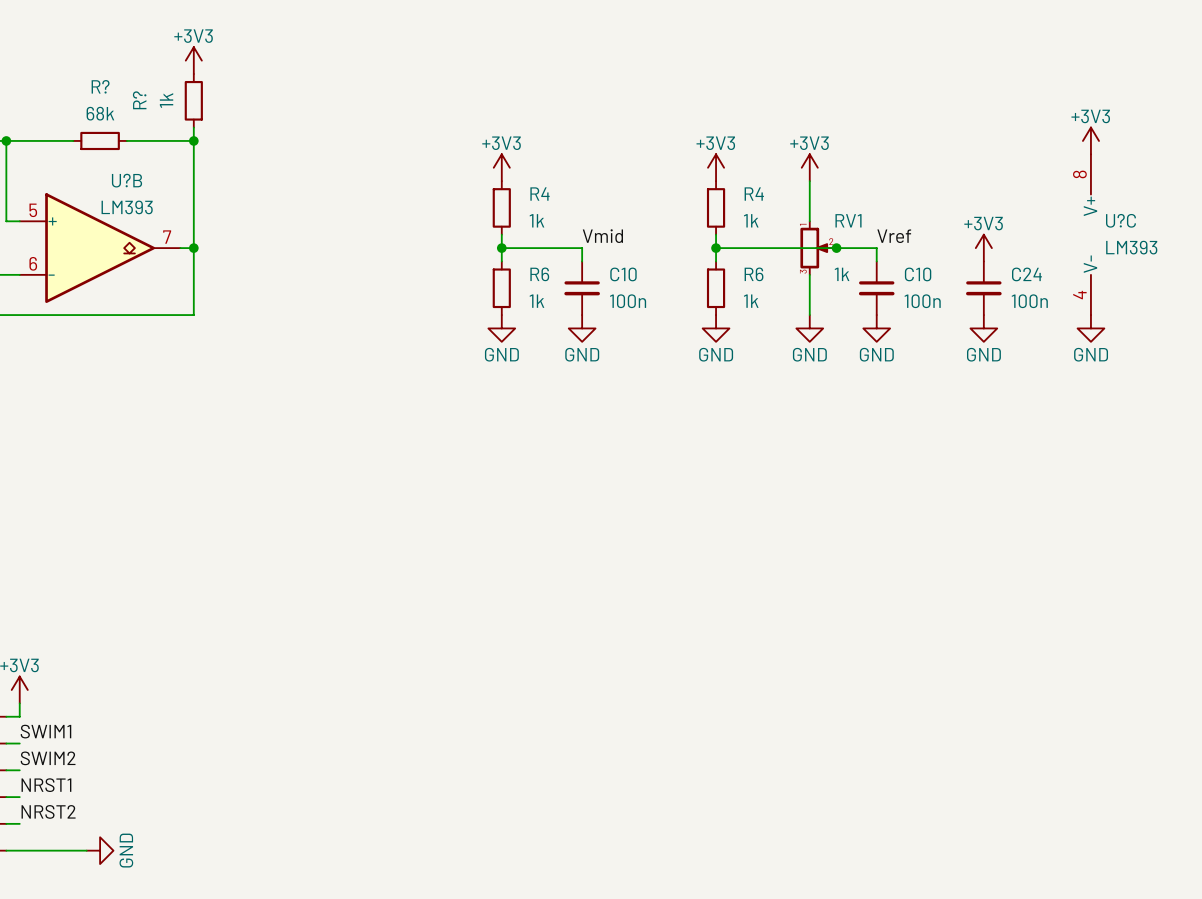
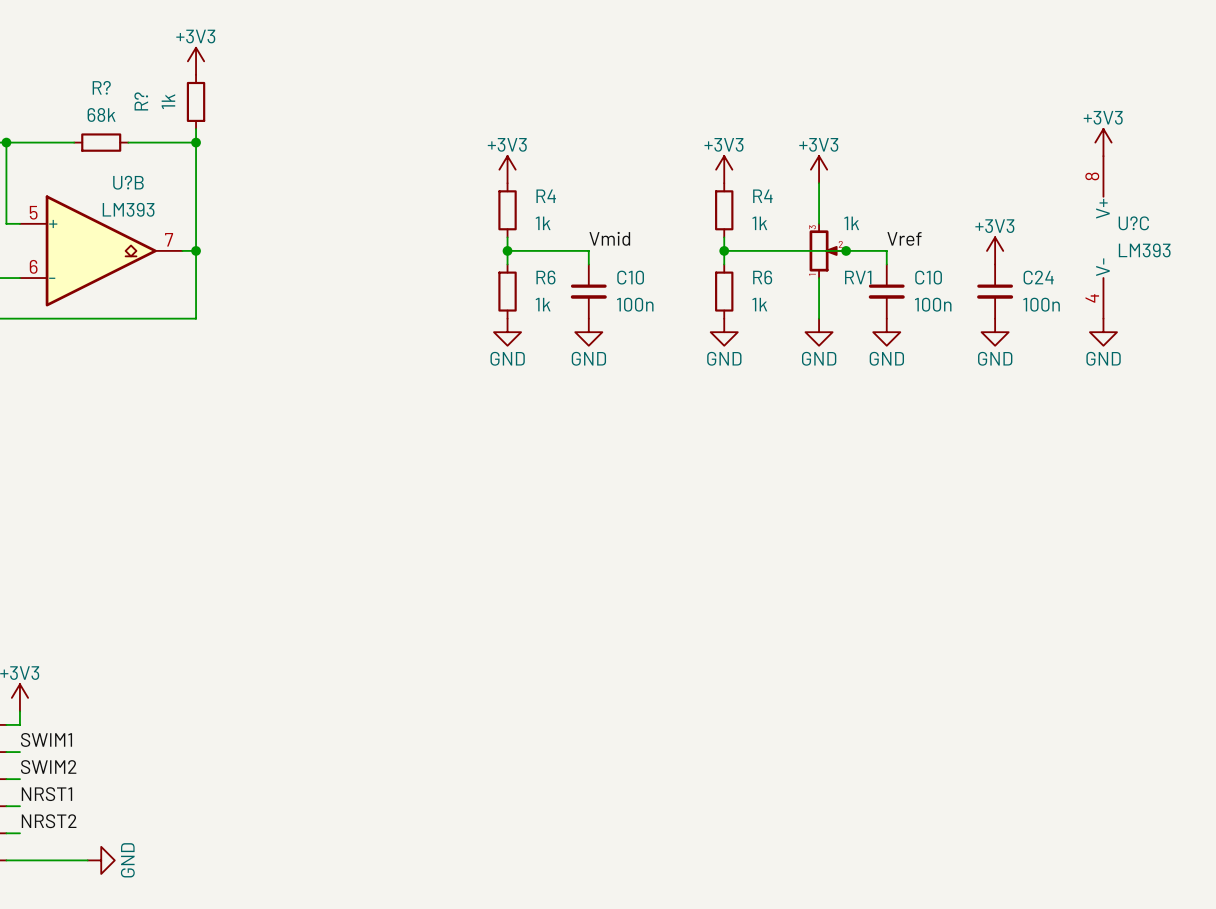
RV1 flip: as is (813, 248) -> up-down (823, 250)

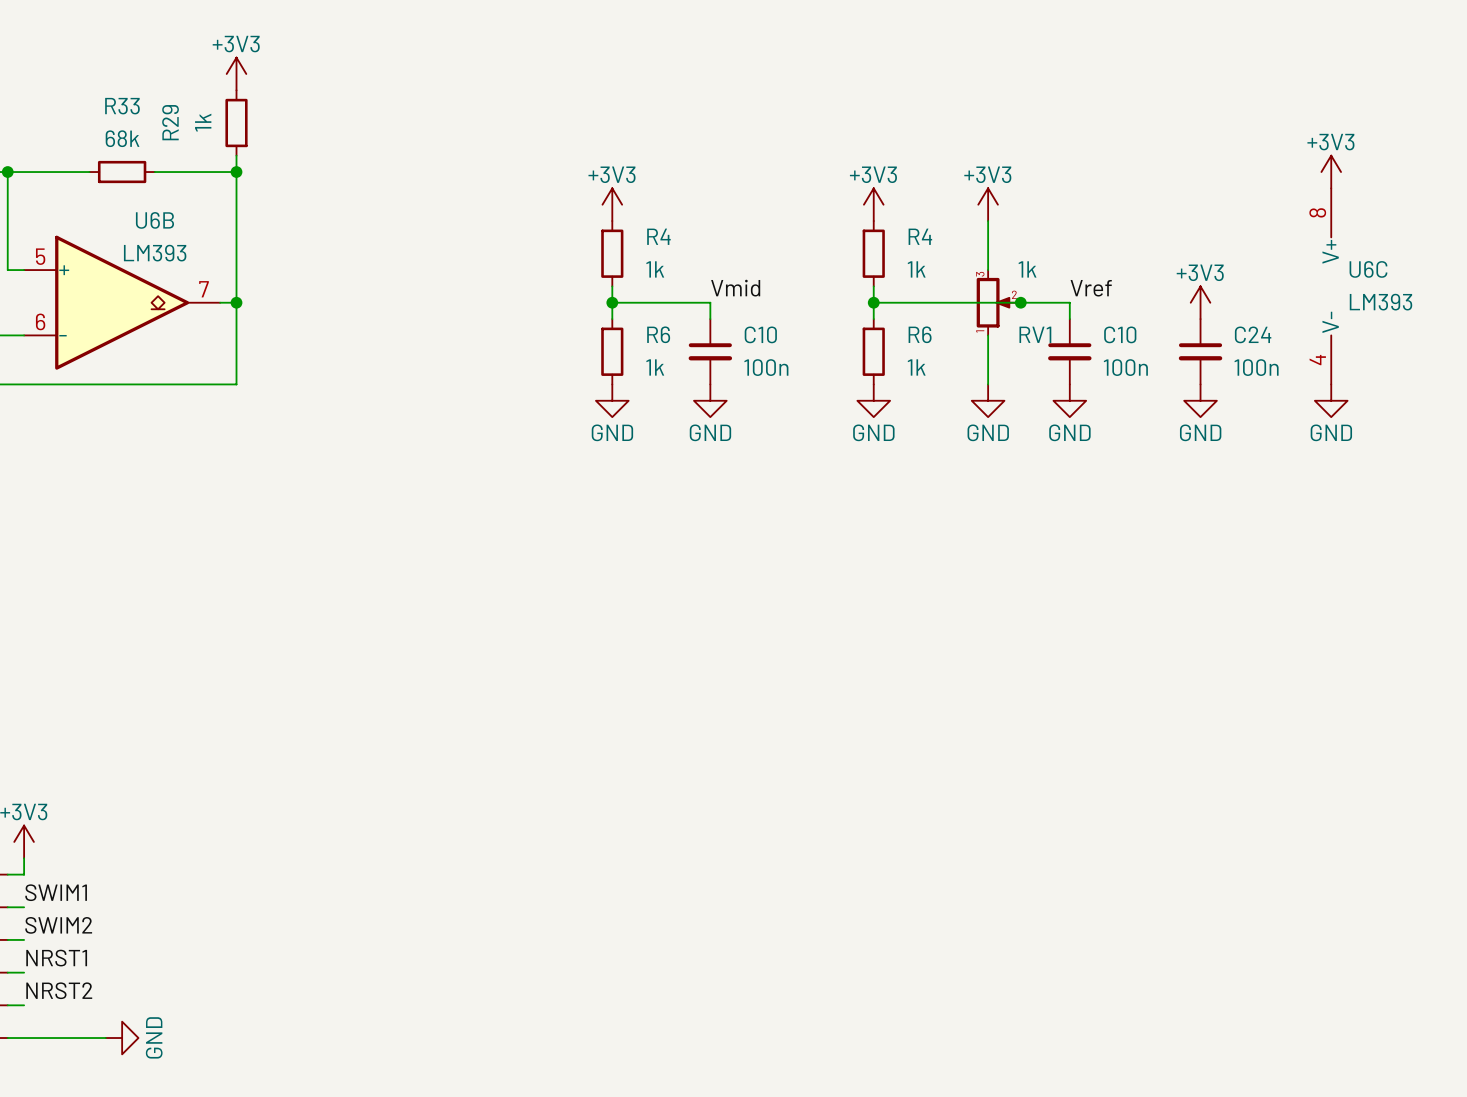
R? name: R? (101, 87) -> R33 (122, 106)
R? name: R? (141, 101) -> R29 (170, 122)
U?B name: U?B (128, 182) -> U6B (154, 220)
U?C name: U?C (1133, 223) -> U6C (1368, 269)

